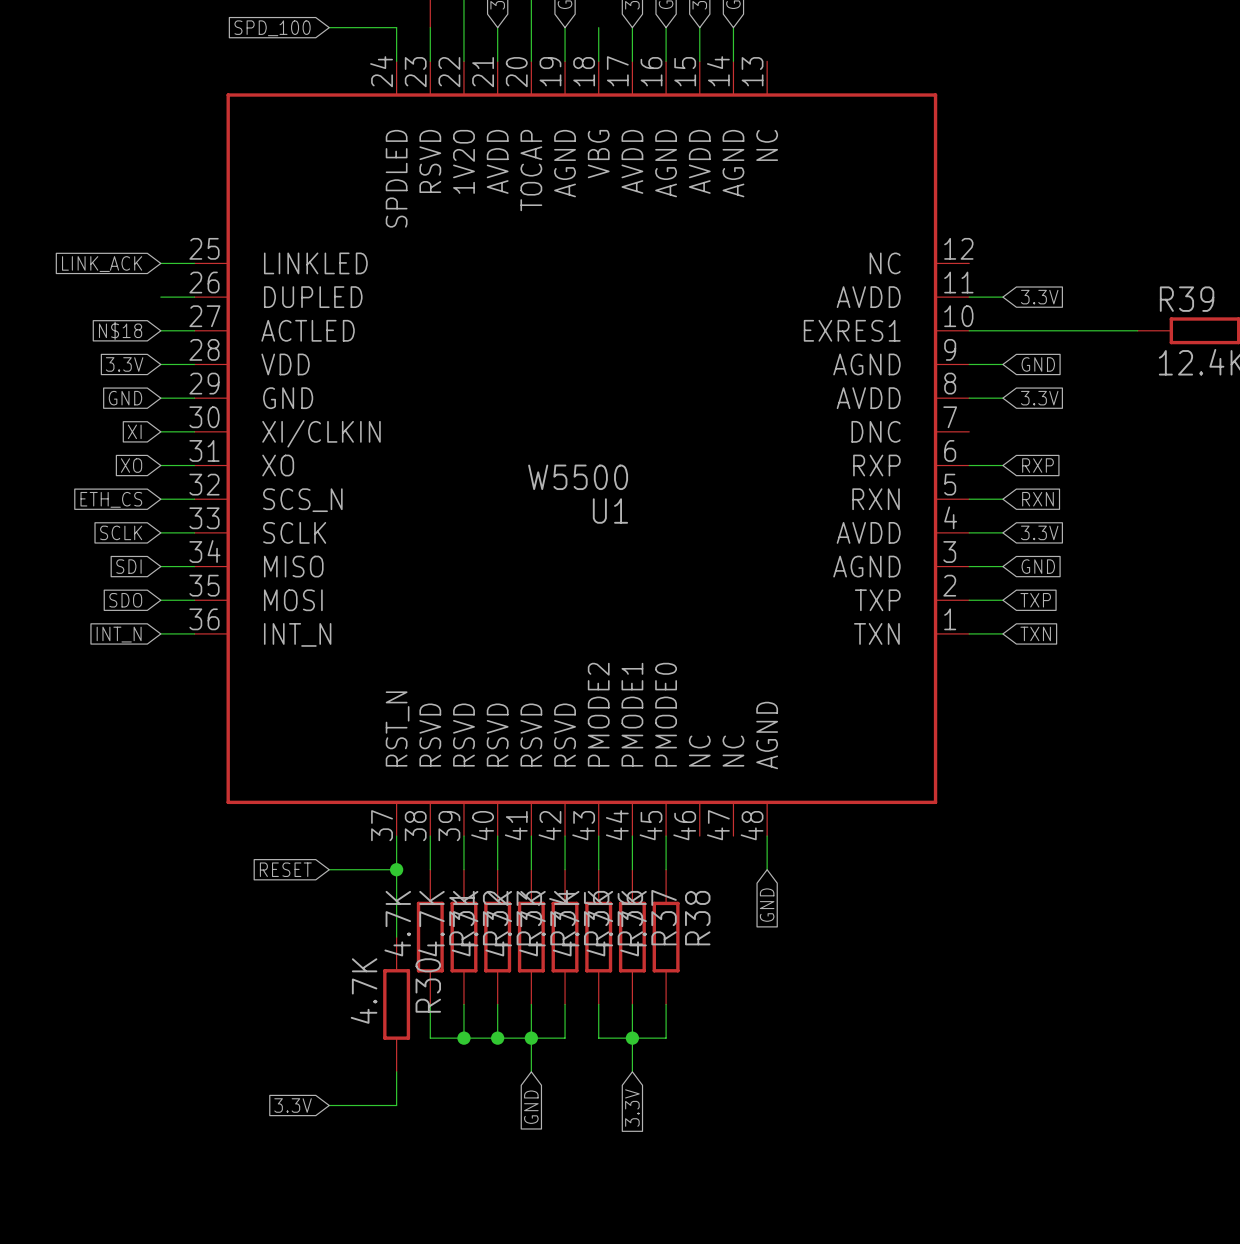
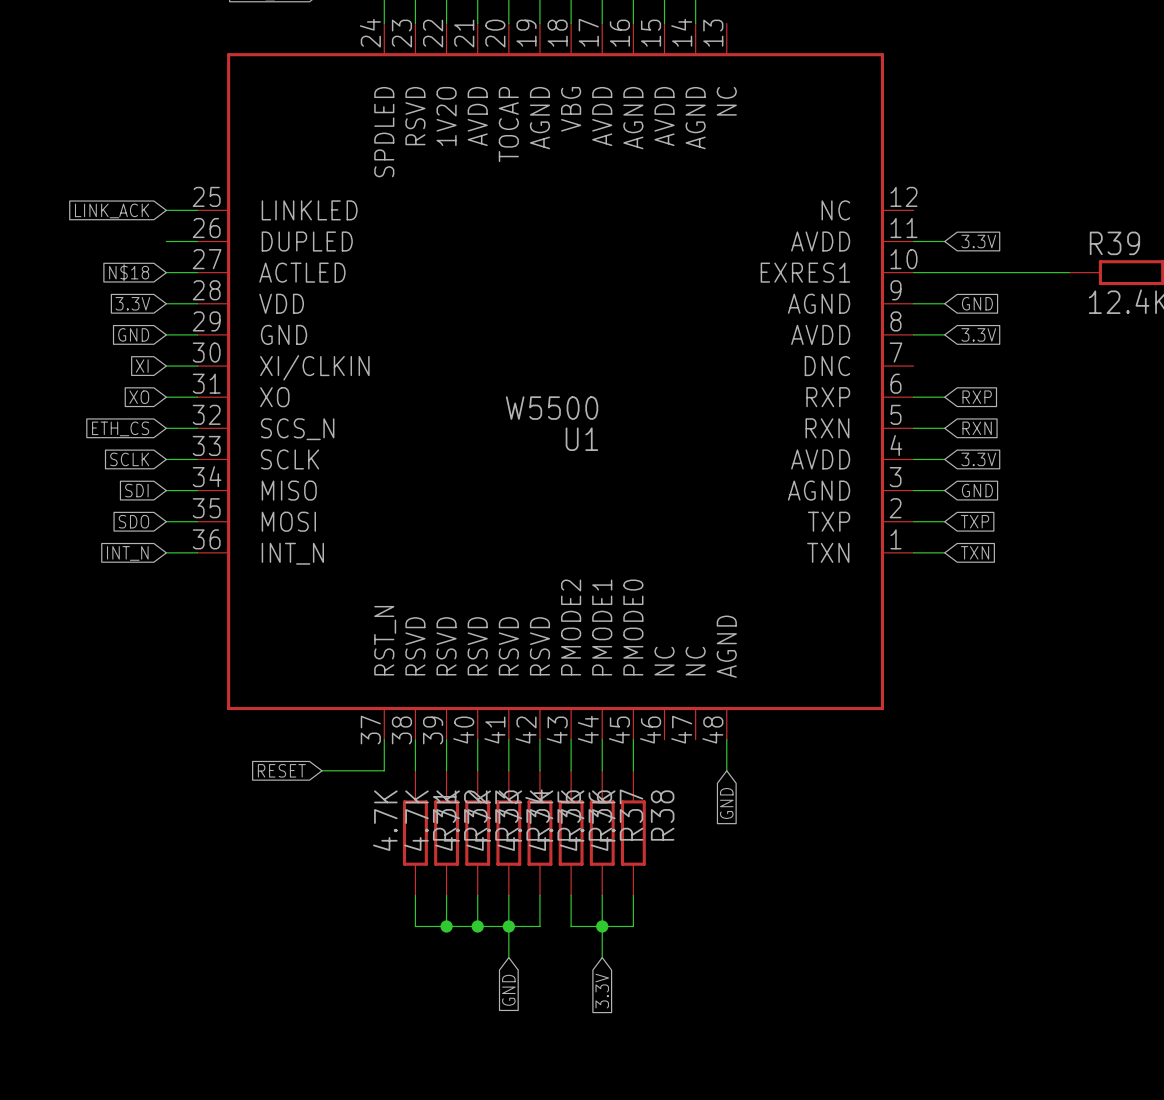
wire: (396, 869) (396, 937) -> none
junction: (396, 869) -> none
R30: 4.7K (396, 1004) -> none
wire: (396, 1071) (396, 1105) (329, 1105) -> none
global label: 3.3V (293, 1105) -> none

